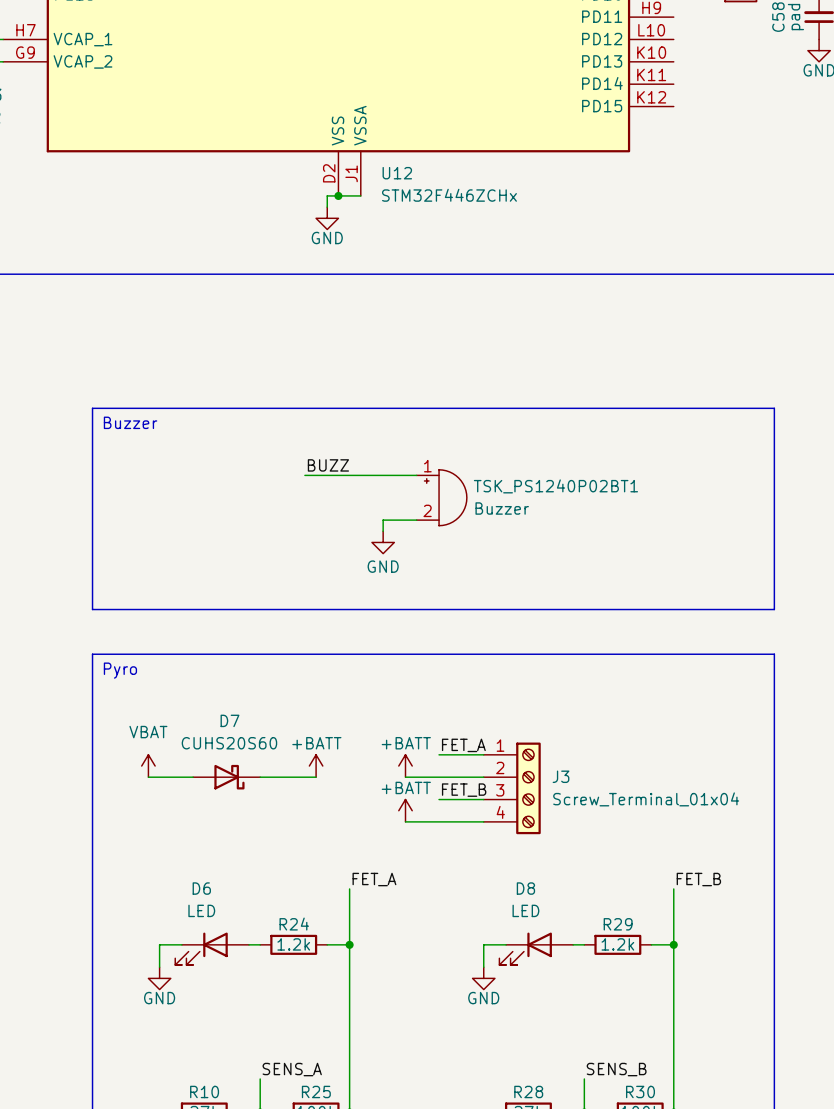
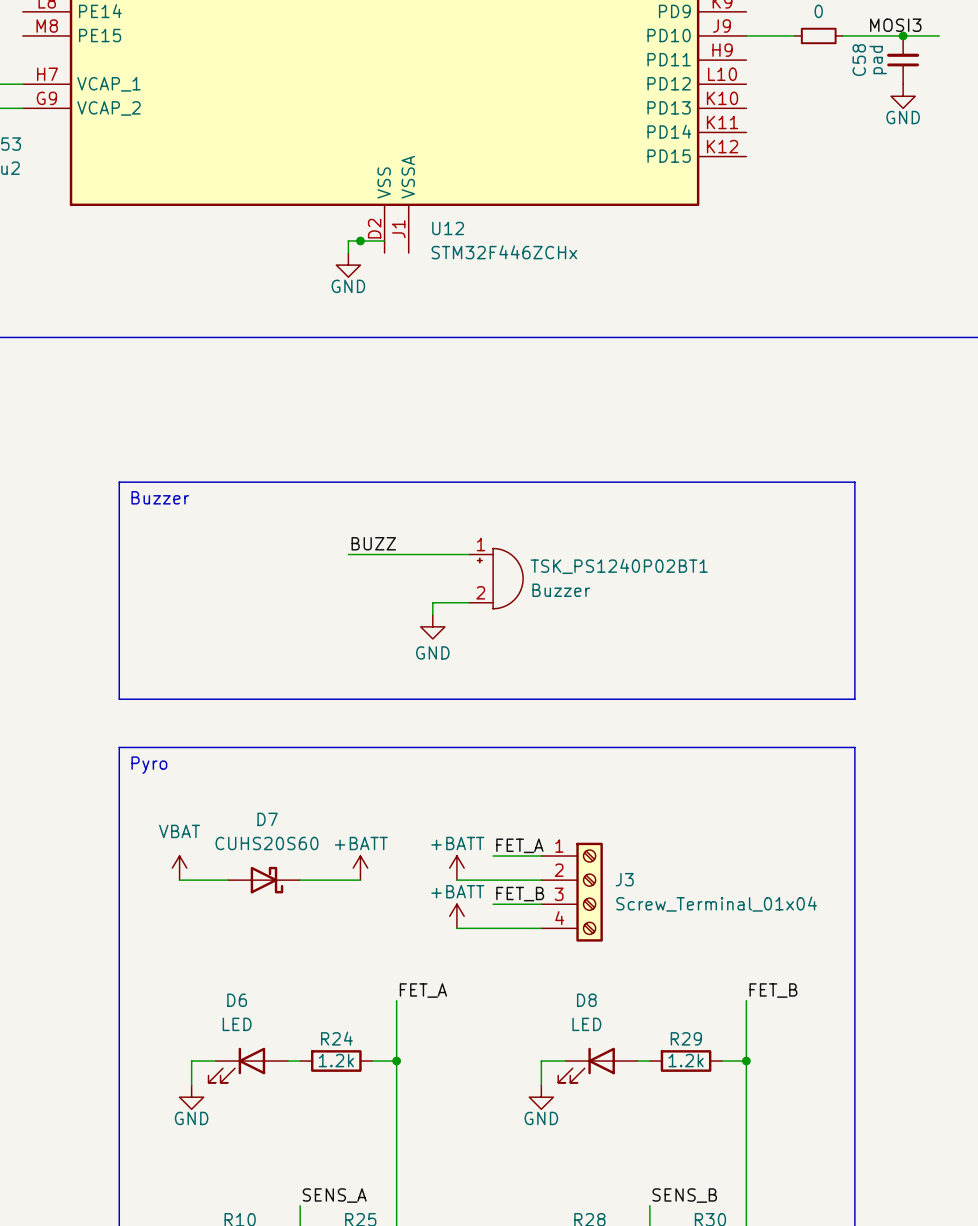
junction position: (338, 195) -> (360, 240)
wire: (360, 195) (327, 195) (327, 207) -> (384, 240) (348, 240) (348, 253)
power symbol position: GND (327, 218) -> GND (348, 265)

